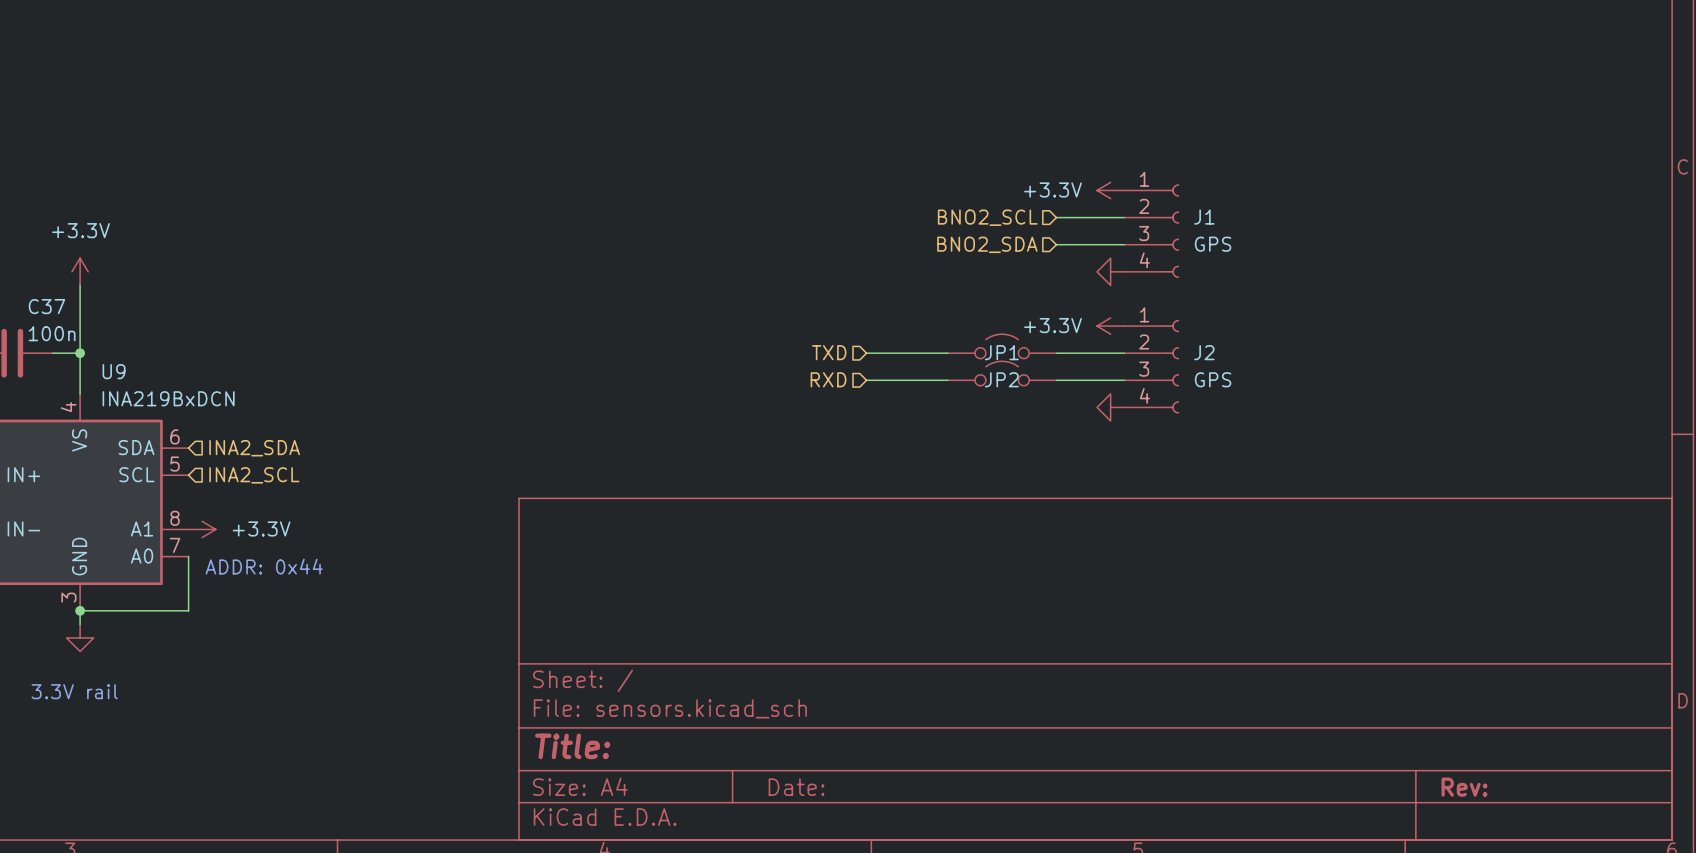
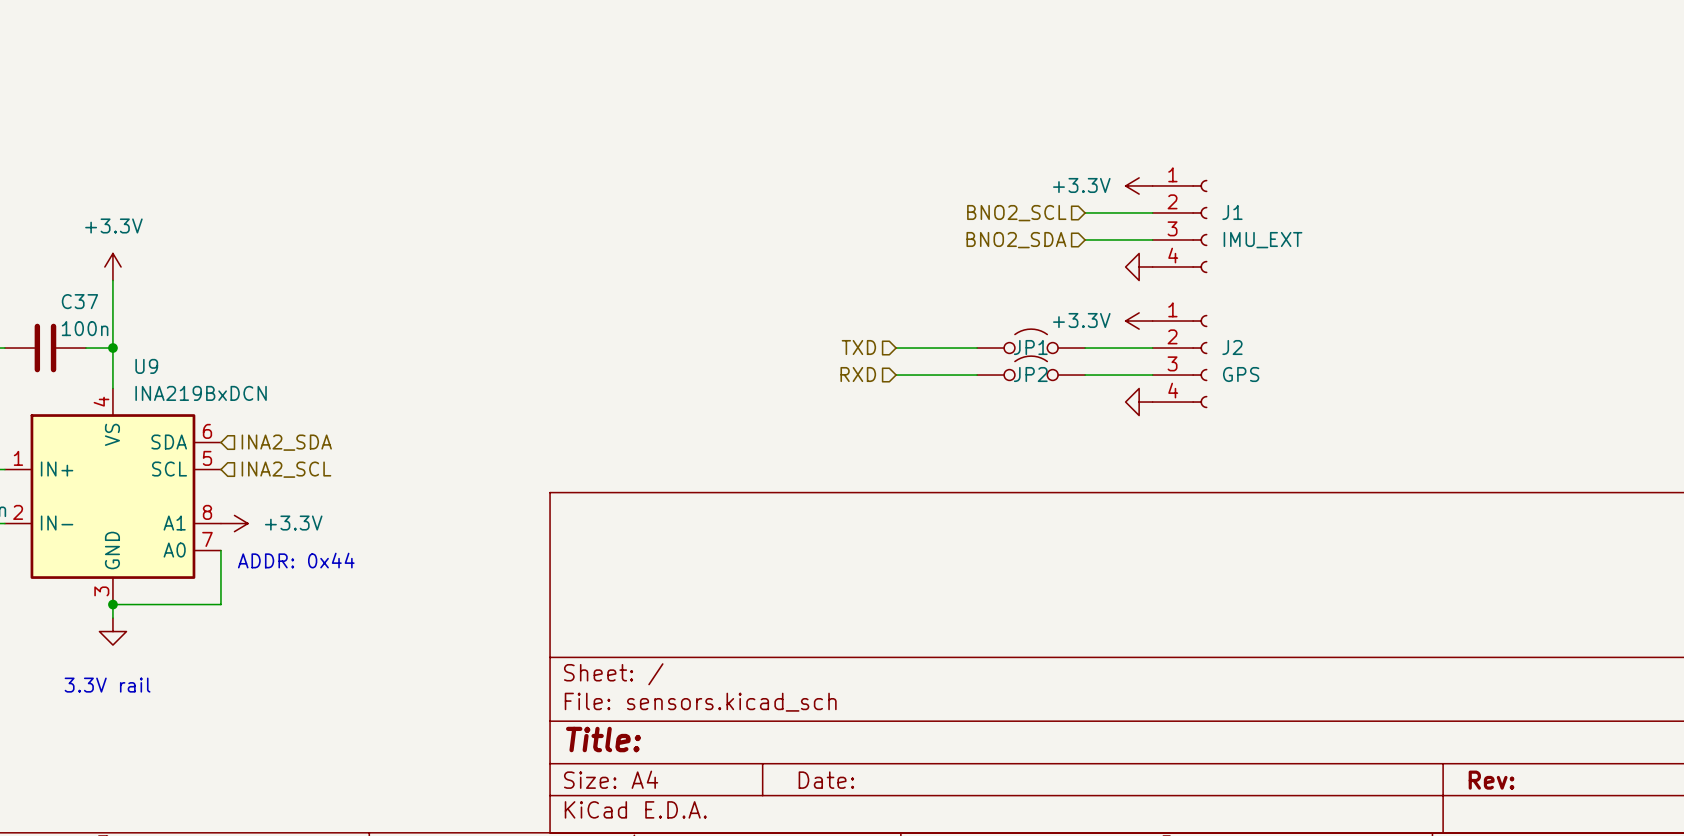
J1 value: GPS (1213, 244) -> IMU_EXT (1263, 240)

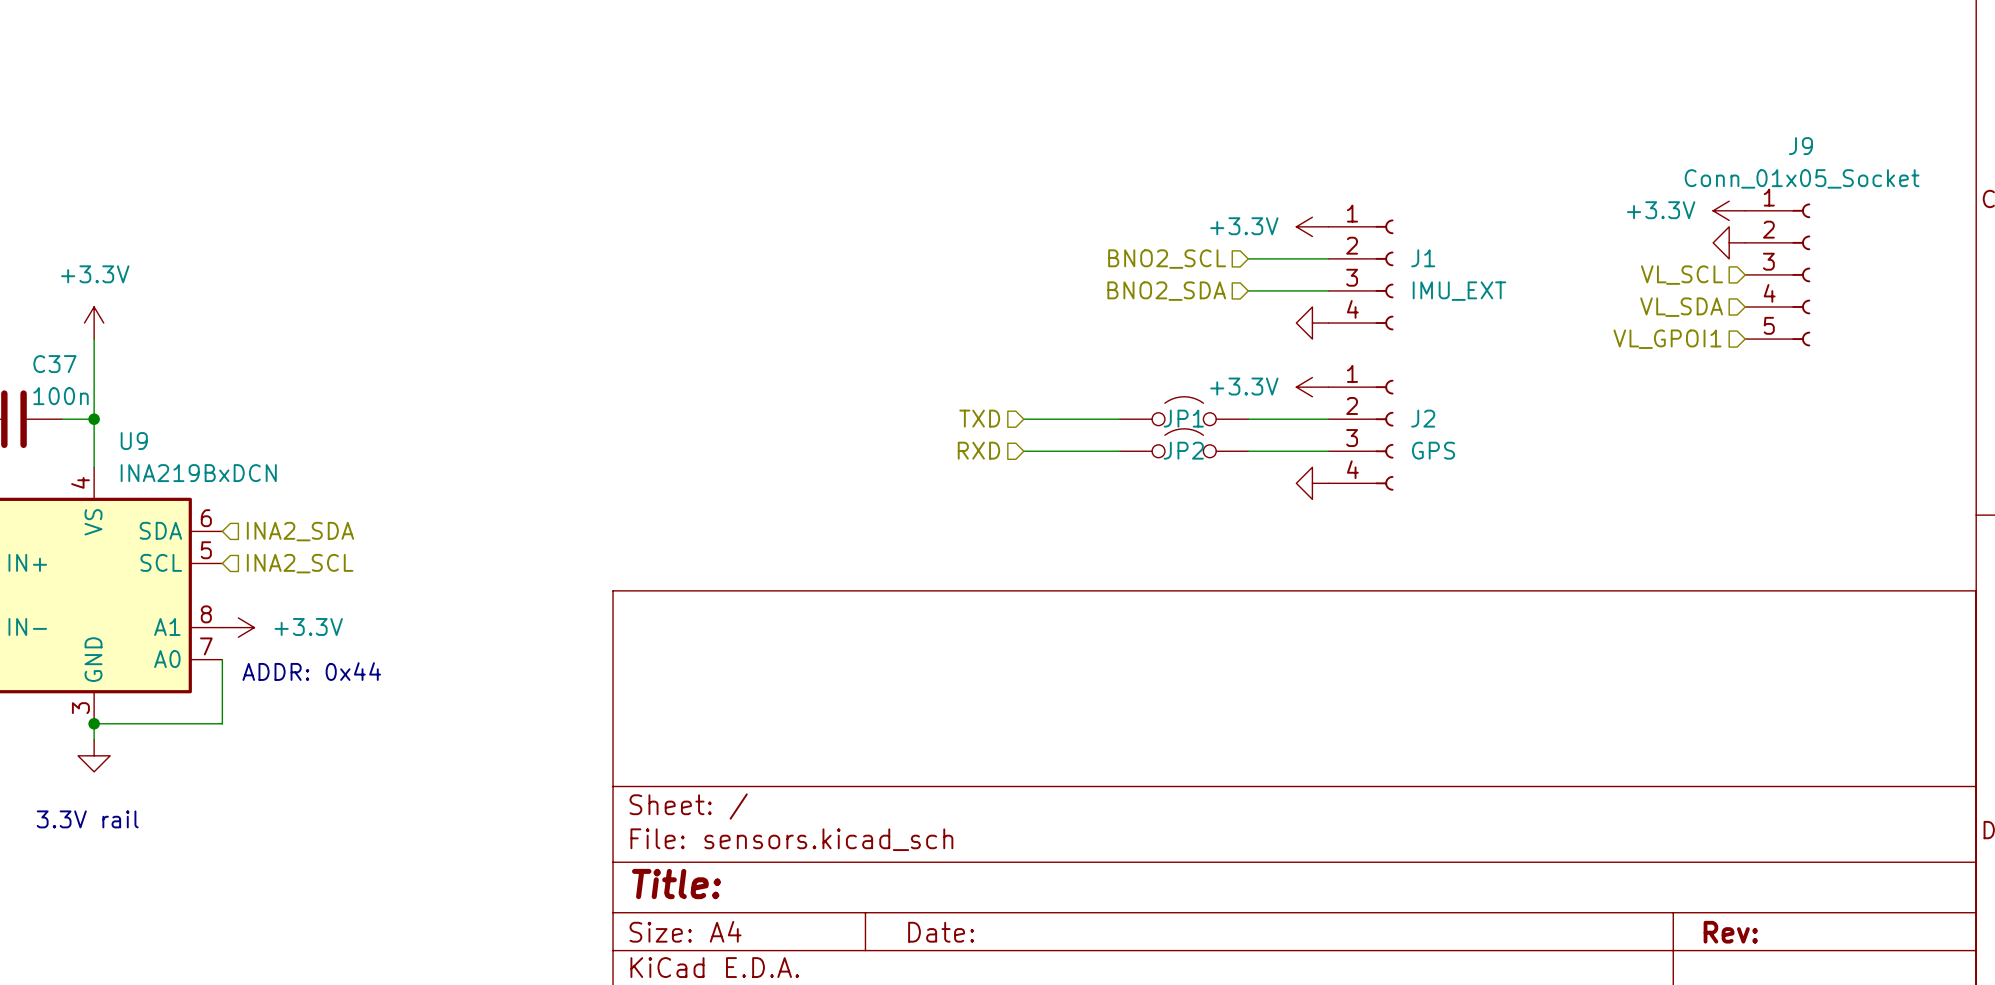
power symbol: none -> +3.3V (1729, 210)
power symbol: none -> (1729, 242)
hierarchical label: none -> VL_SCL (1681, 275)
J9: none -> Conn_01x05_Socket (1777, 274)
hierarchical label: none -> VL_SDA (1681, 307)
hierarchical label: none -> VL_GPOI1 (1667, 339)

